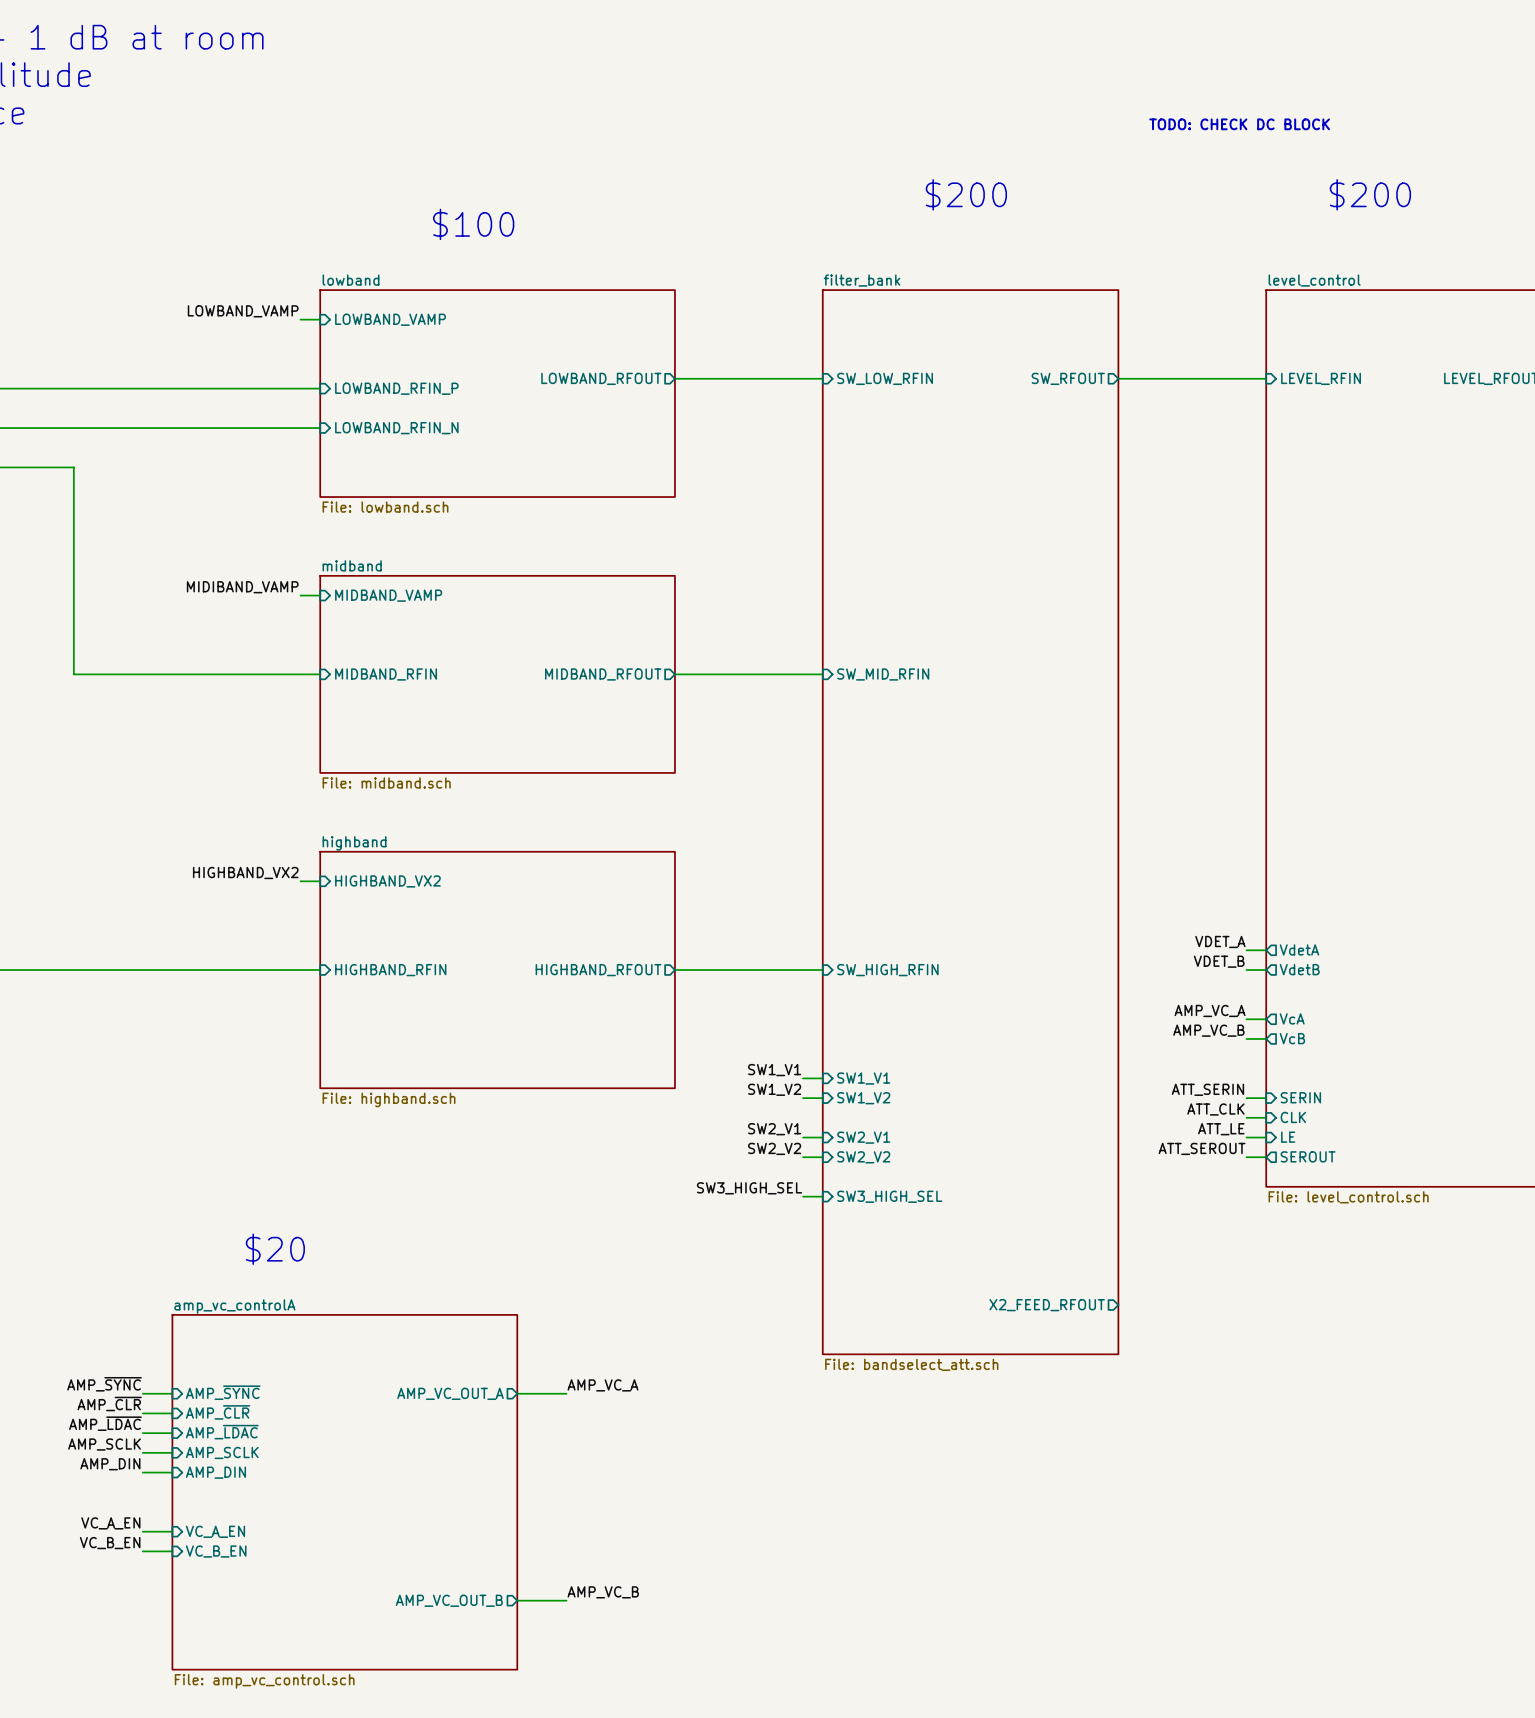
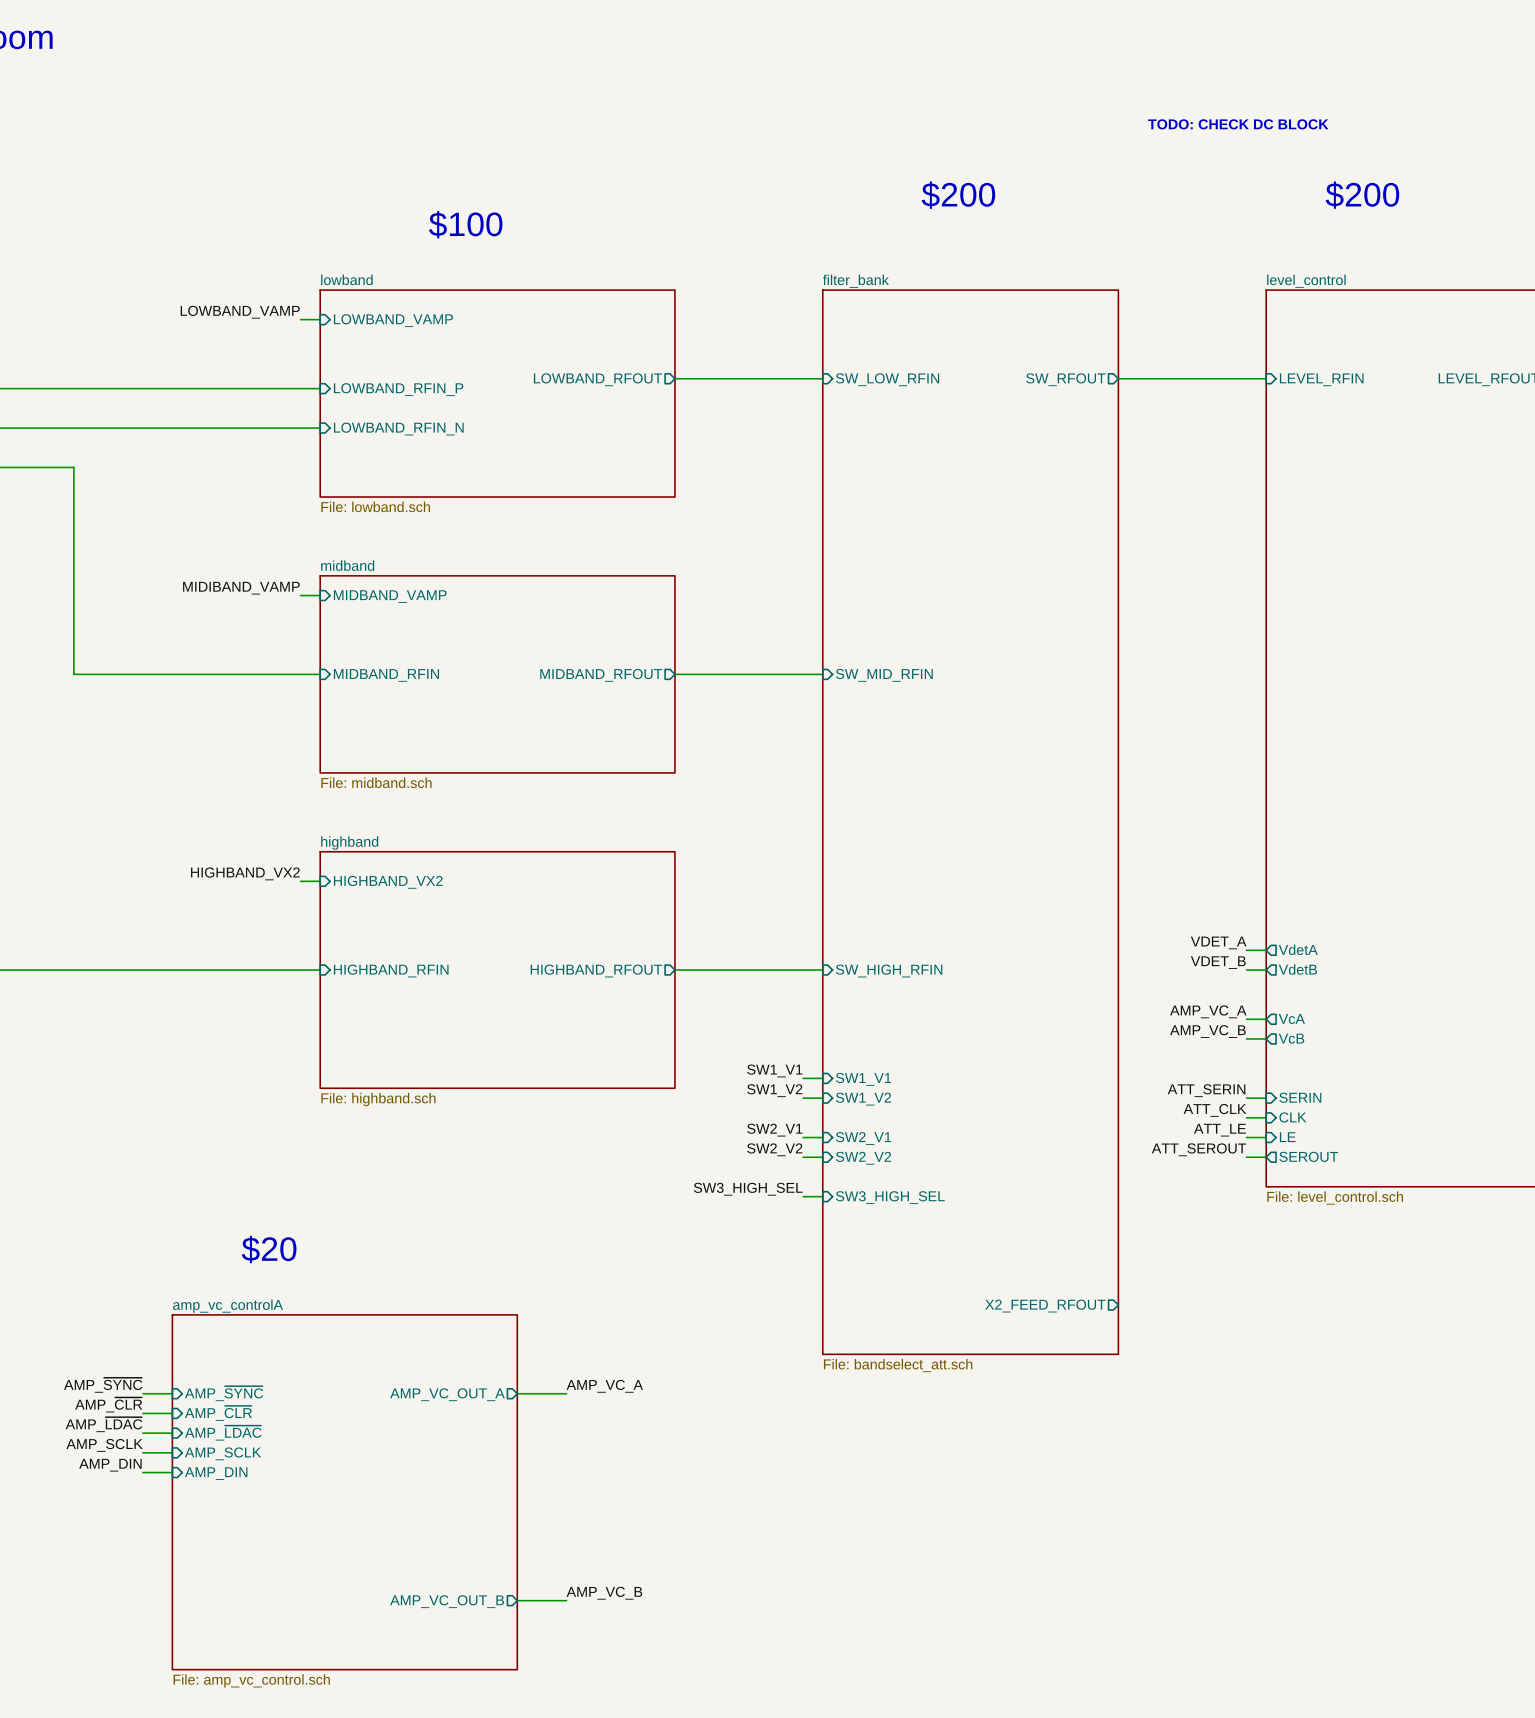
label: VC_A_EN (110, 1523) -> none
wire: (142, 1531) (172, 1531) -> none
sheet pin: VC_A_EN (215, 1531) -> none
label: VC_B_EN (110, 1543) -> none
wire: (142, 1551) (172, 1551) -> none
sheet pin: VC_B_EN (216, 1551) -> none

